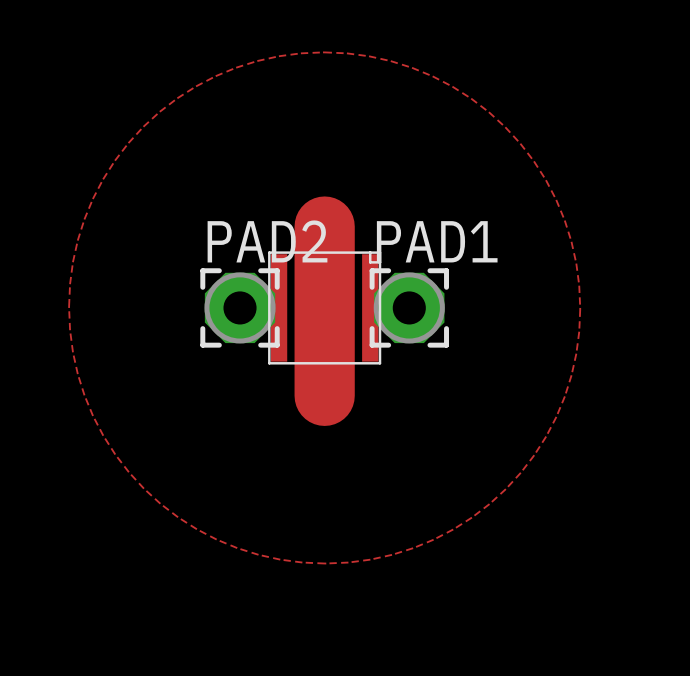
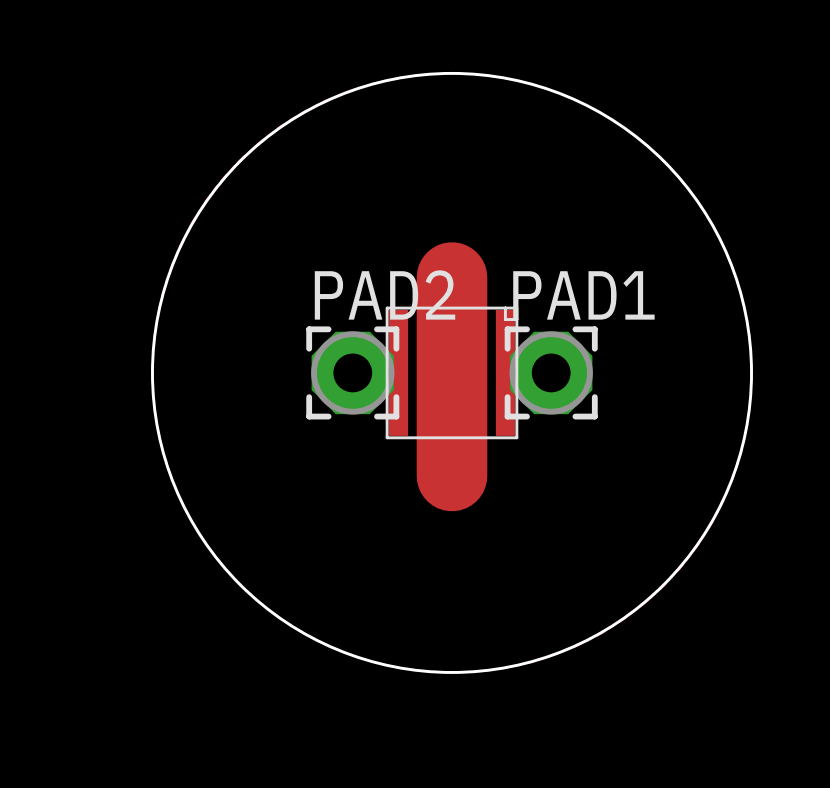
round board edge: none -> [151, 71, 753, 674]

